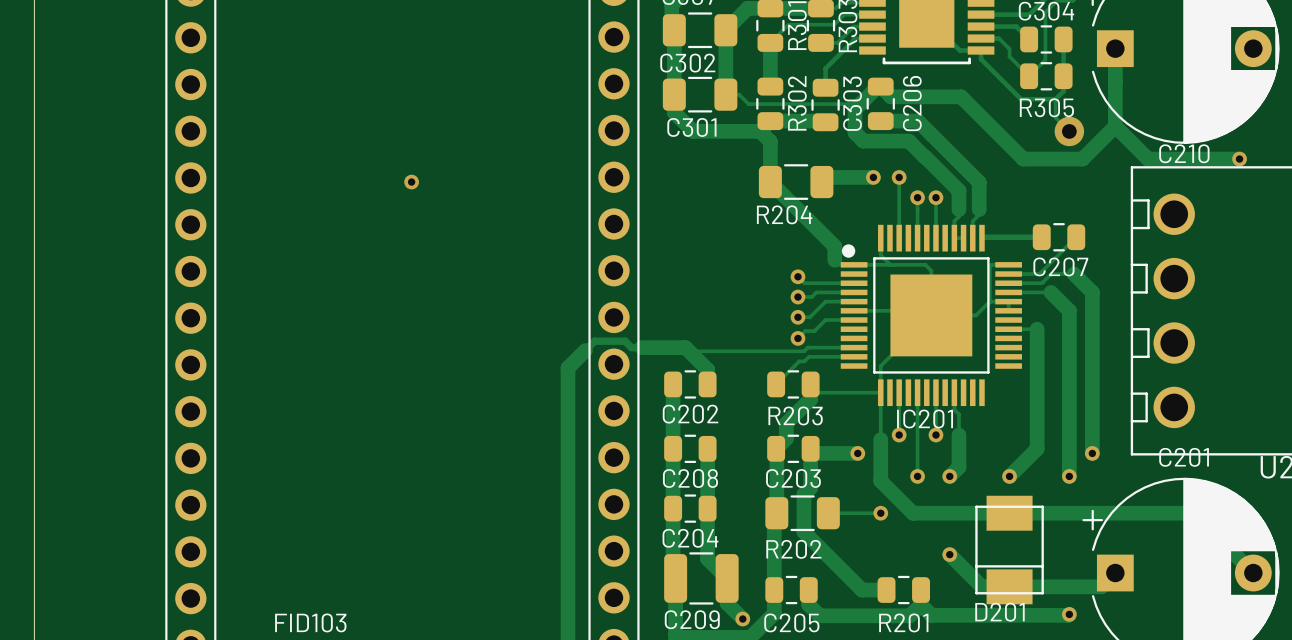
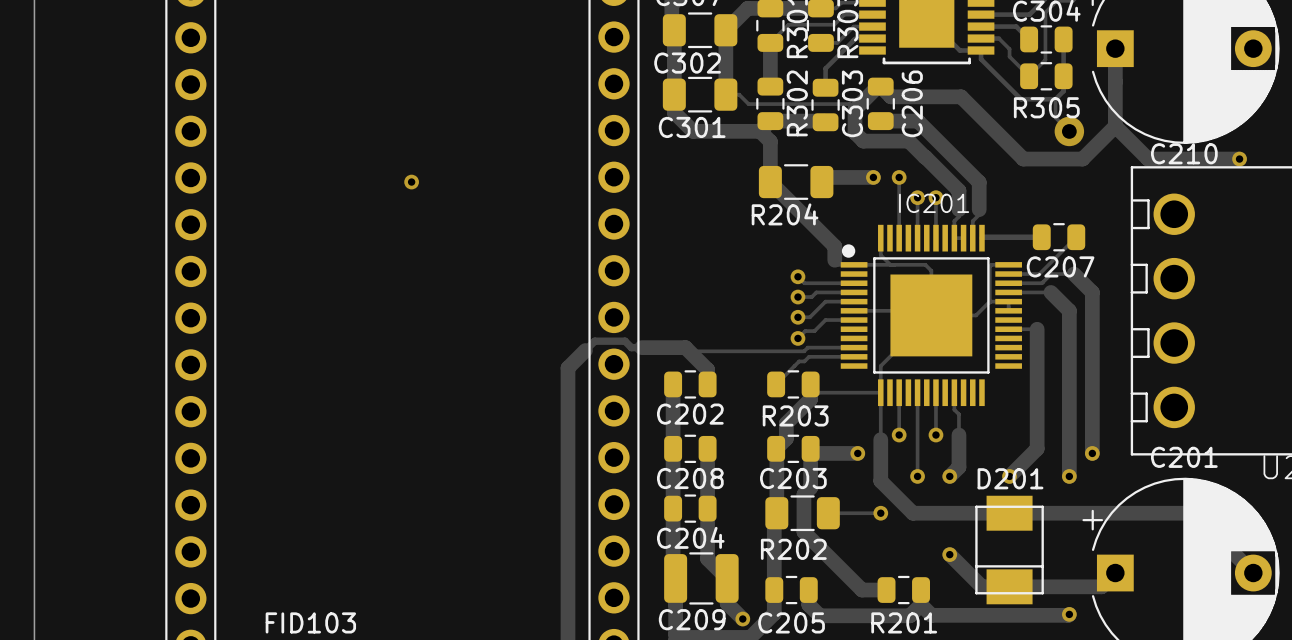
IC201 name position: IC201 (925, 418) -> IC201 (934, 203)
D201 name position: D201 (999, 612) -> D201 (1010, 478)

